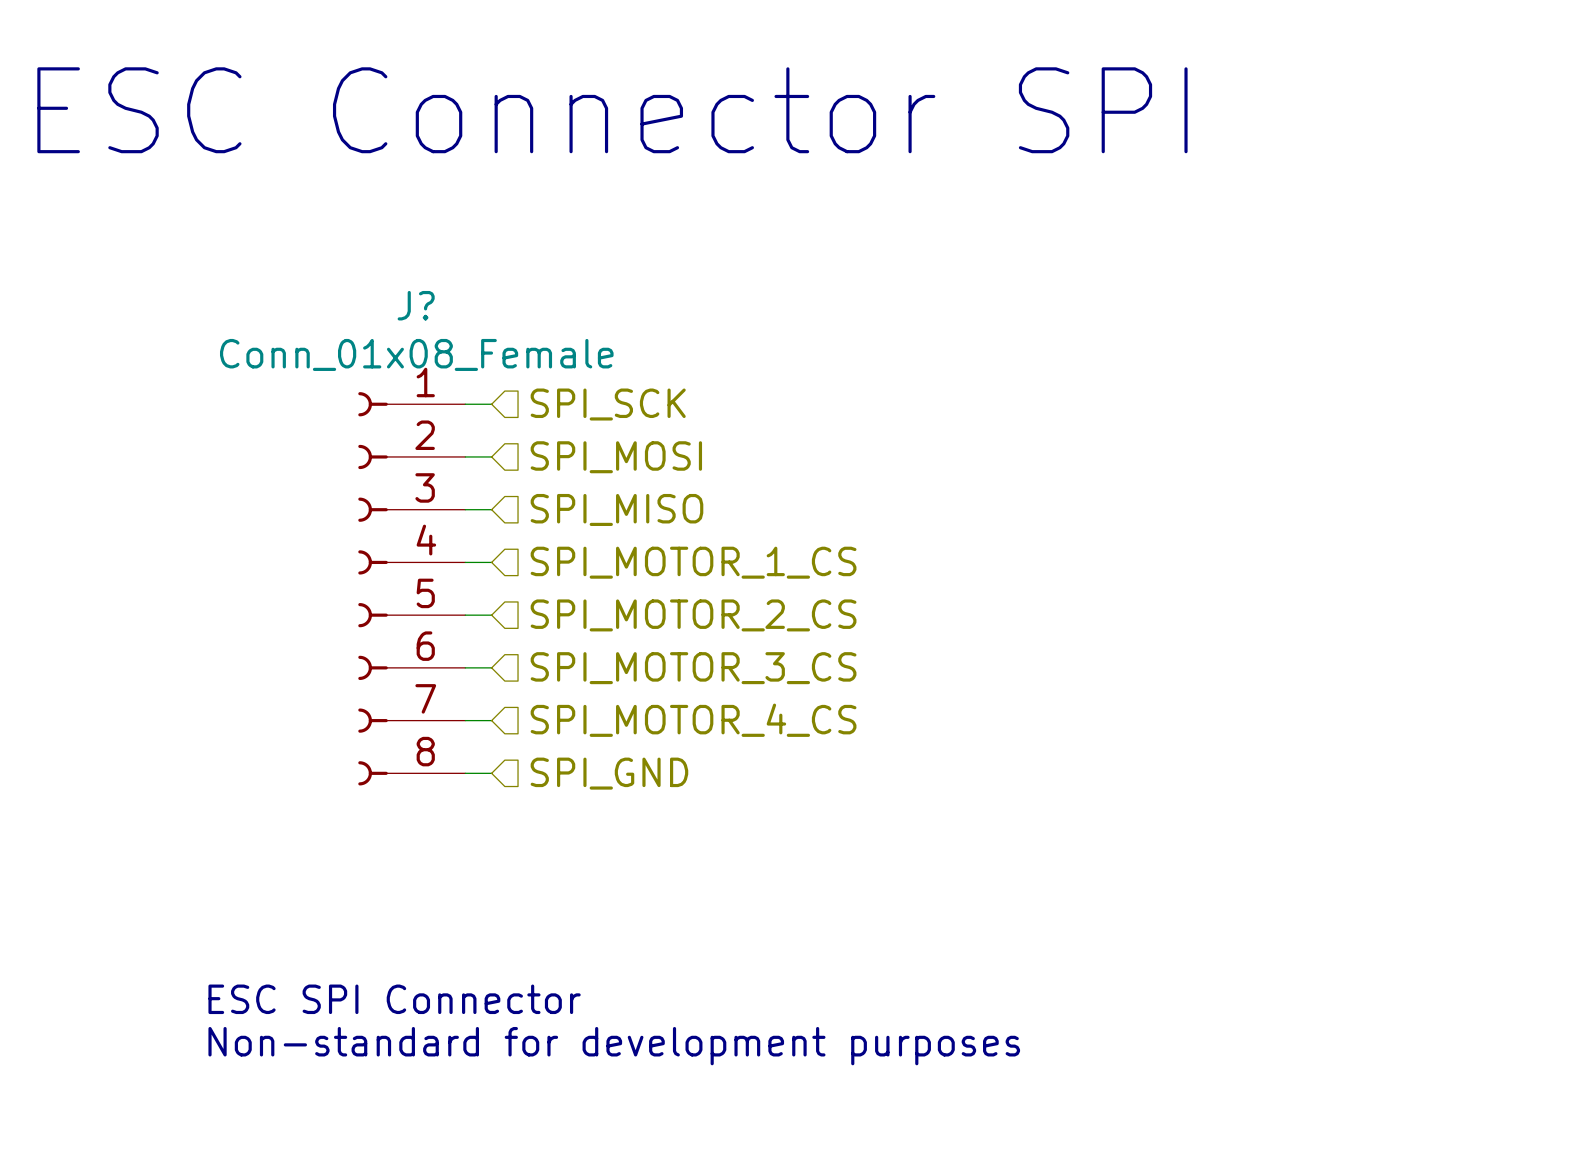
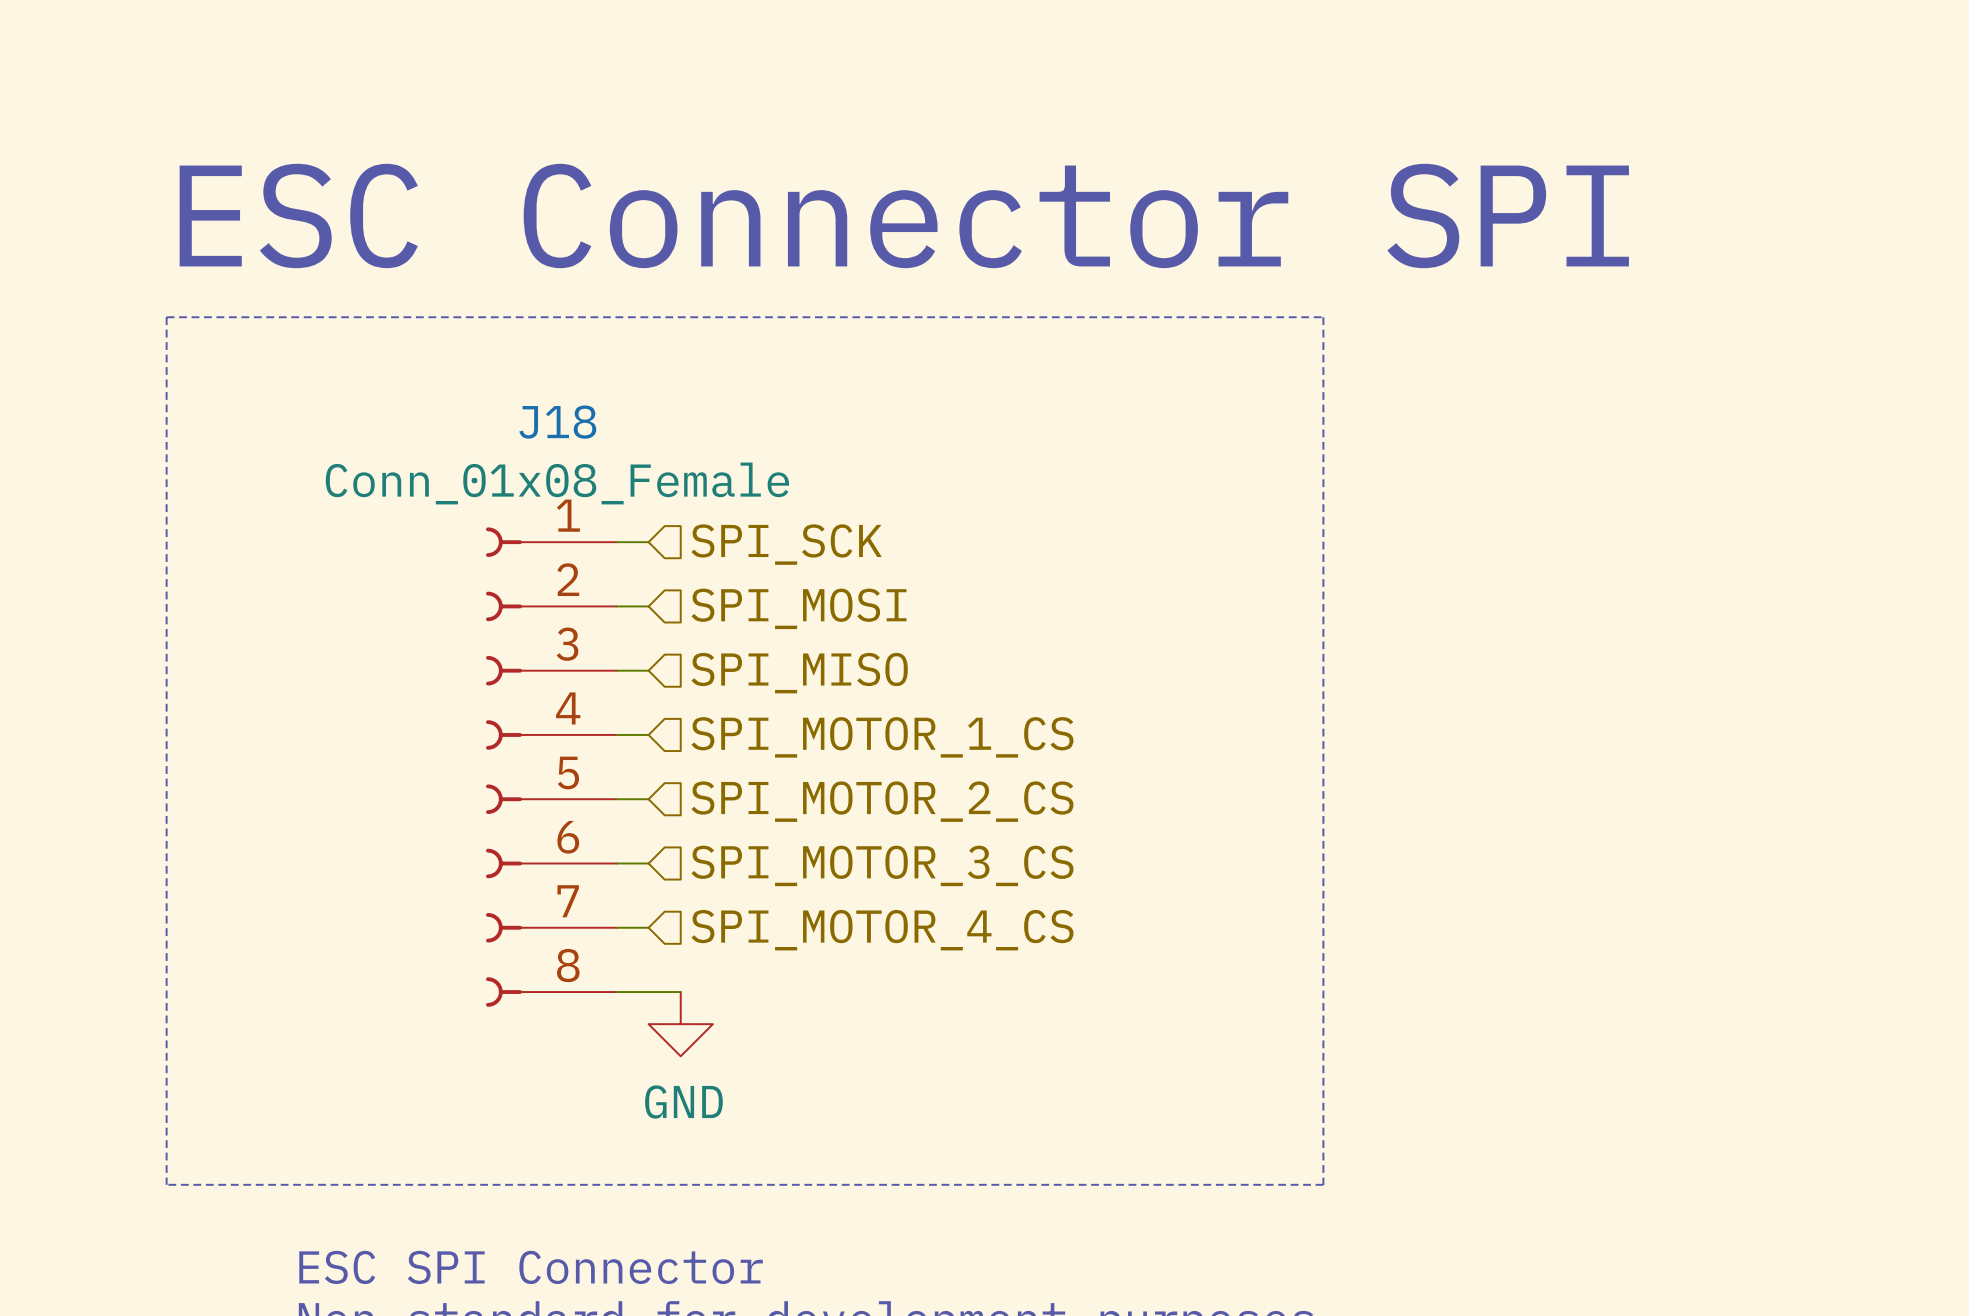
text position: ESC Connector SPI (612, 110) -> ESC Connector SPI (904, 215)
line: none -> (166, 317) (1323, 317) (1323, 1184) (166, 1184) (166, 317)
J? name: J? (416, 305) -> J18 (557, 422)
wire: none -> (648, 992) (680, 992)
hierarchical label: SPI_GND (609, 773) -> none
power symbol: none -> GND (680, 1024)

